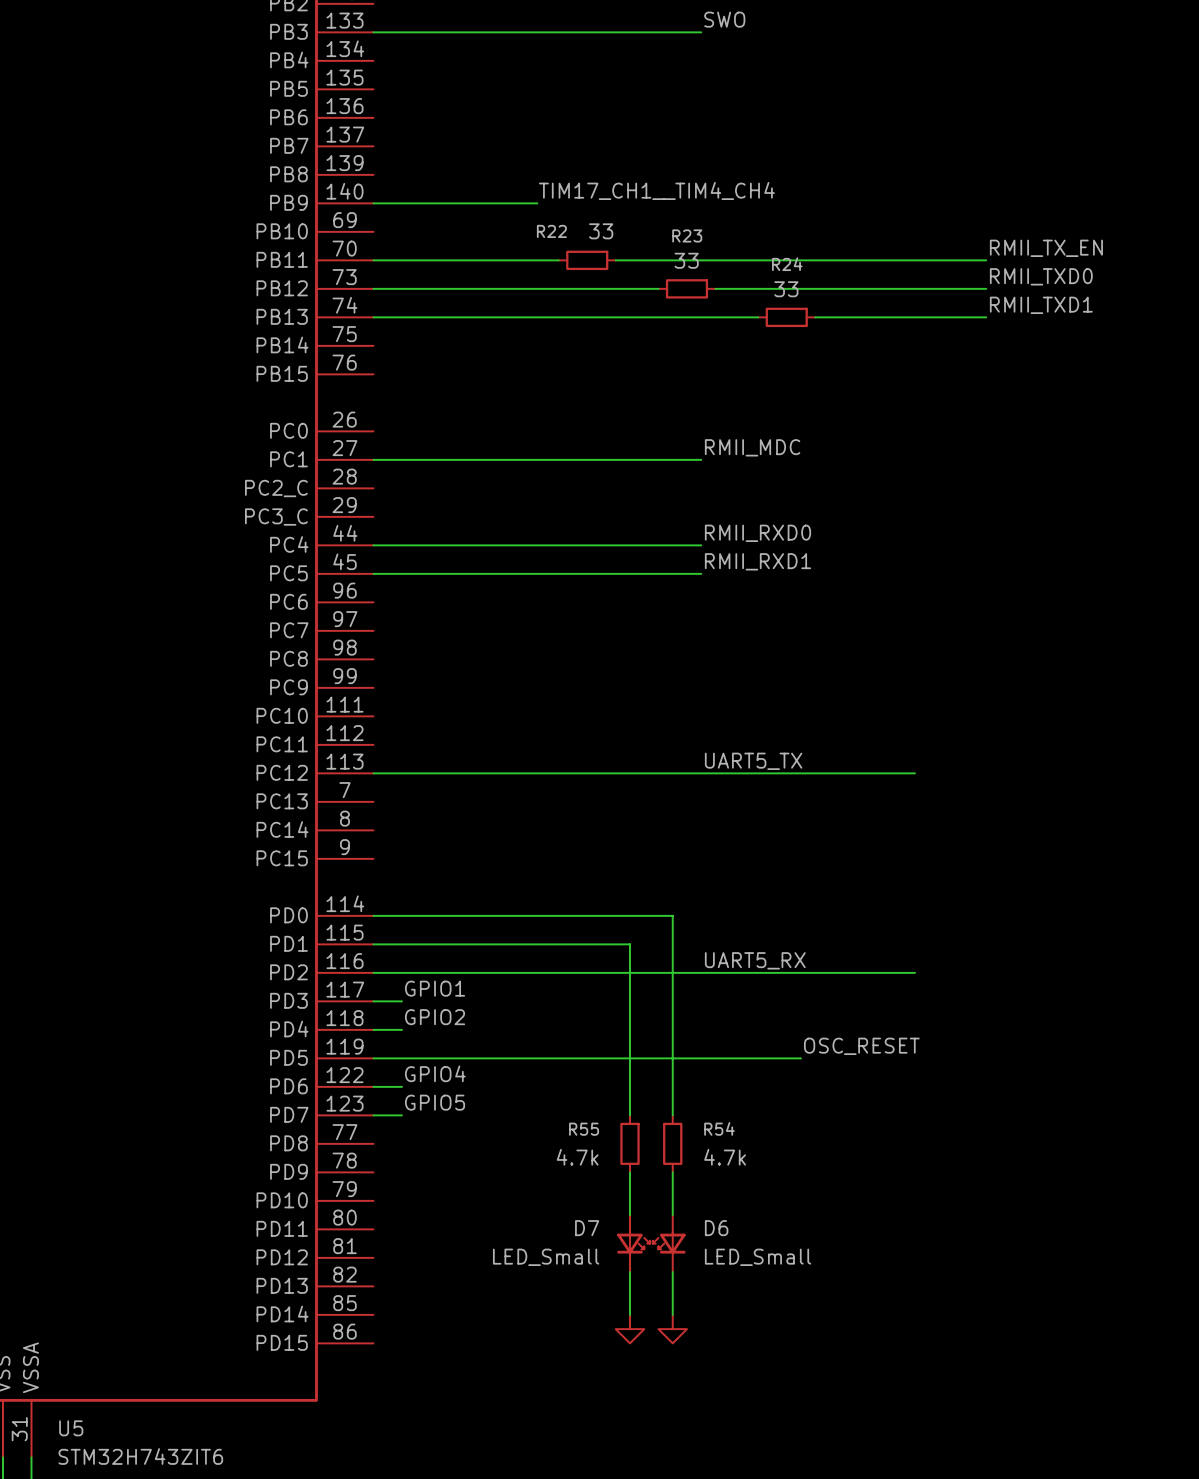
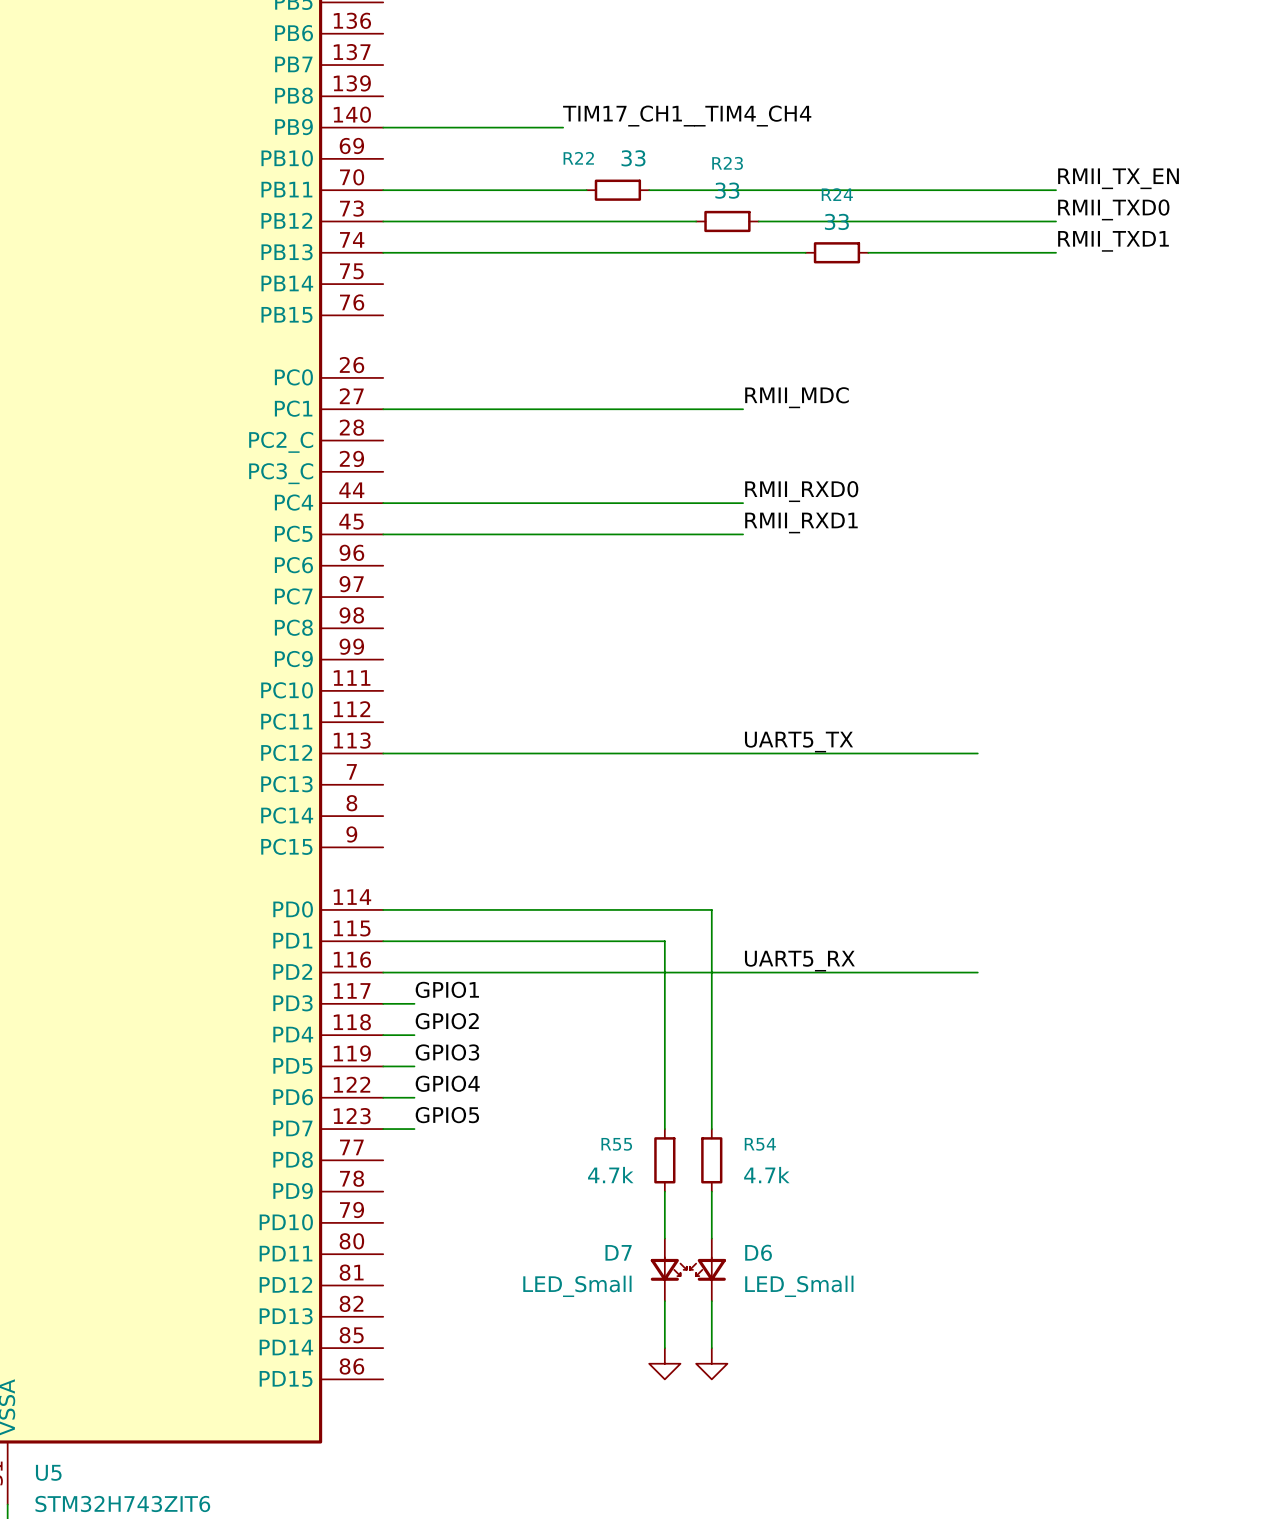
label: none -> GPIO3 (447, 1052)
label: OSC_RESET (861, 1046) -> none
wire: (401, 1058) (800, 1058) -> none

